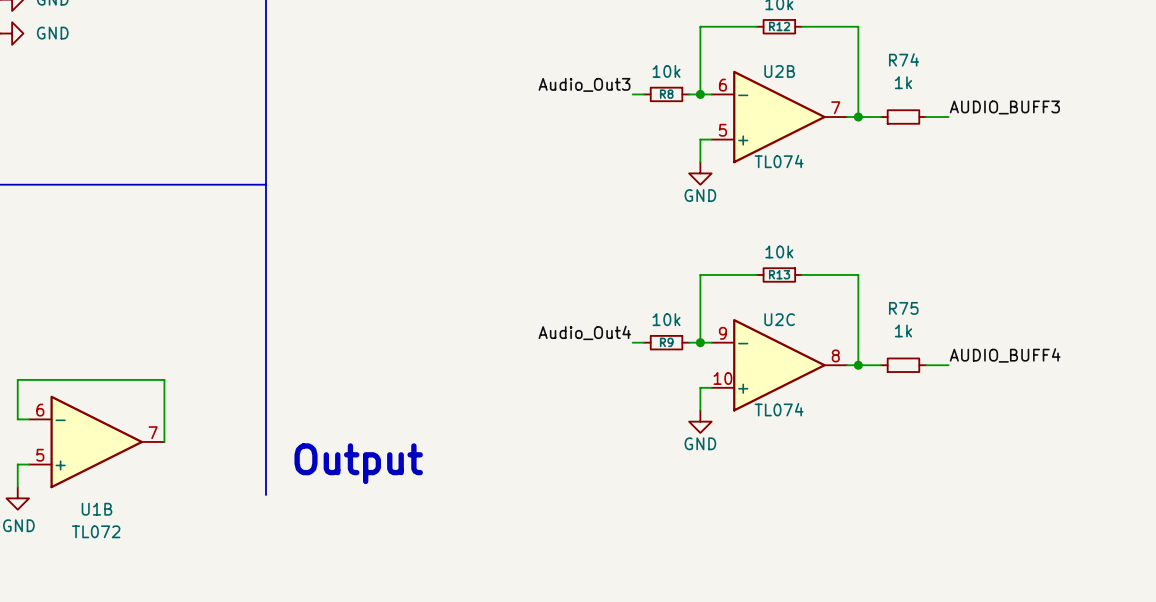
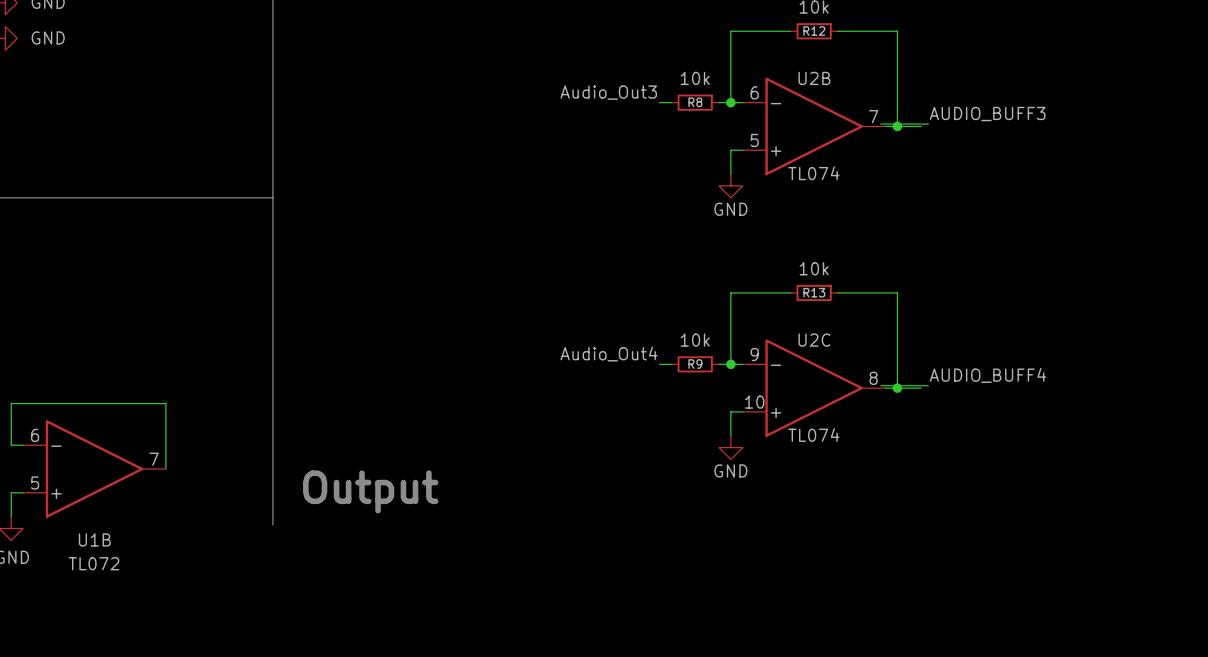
label position: AUDIO_BUFF3 (1004, 107) -> AUDIO_BUFF3 (987, 114)
wire: none -> (880, 124) (928, 124)
R74: 1k (903, 117) -> none
wire: (926, 117) (948, 117) -> none
label position: AUDIO_BUFF4 (1005, 355) -> AUDIO_BUFF4 (987, 375)
wire: none -> (880, 385) (928, 385)
R75: 1k (903, 365) -> none
wire: (926, 365) (948, 365) -> none

